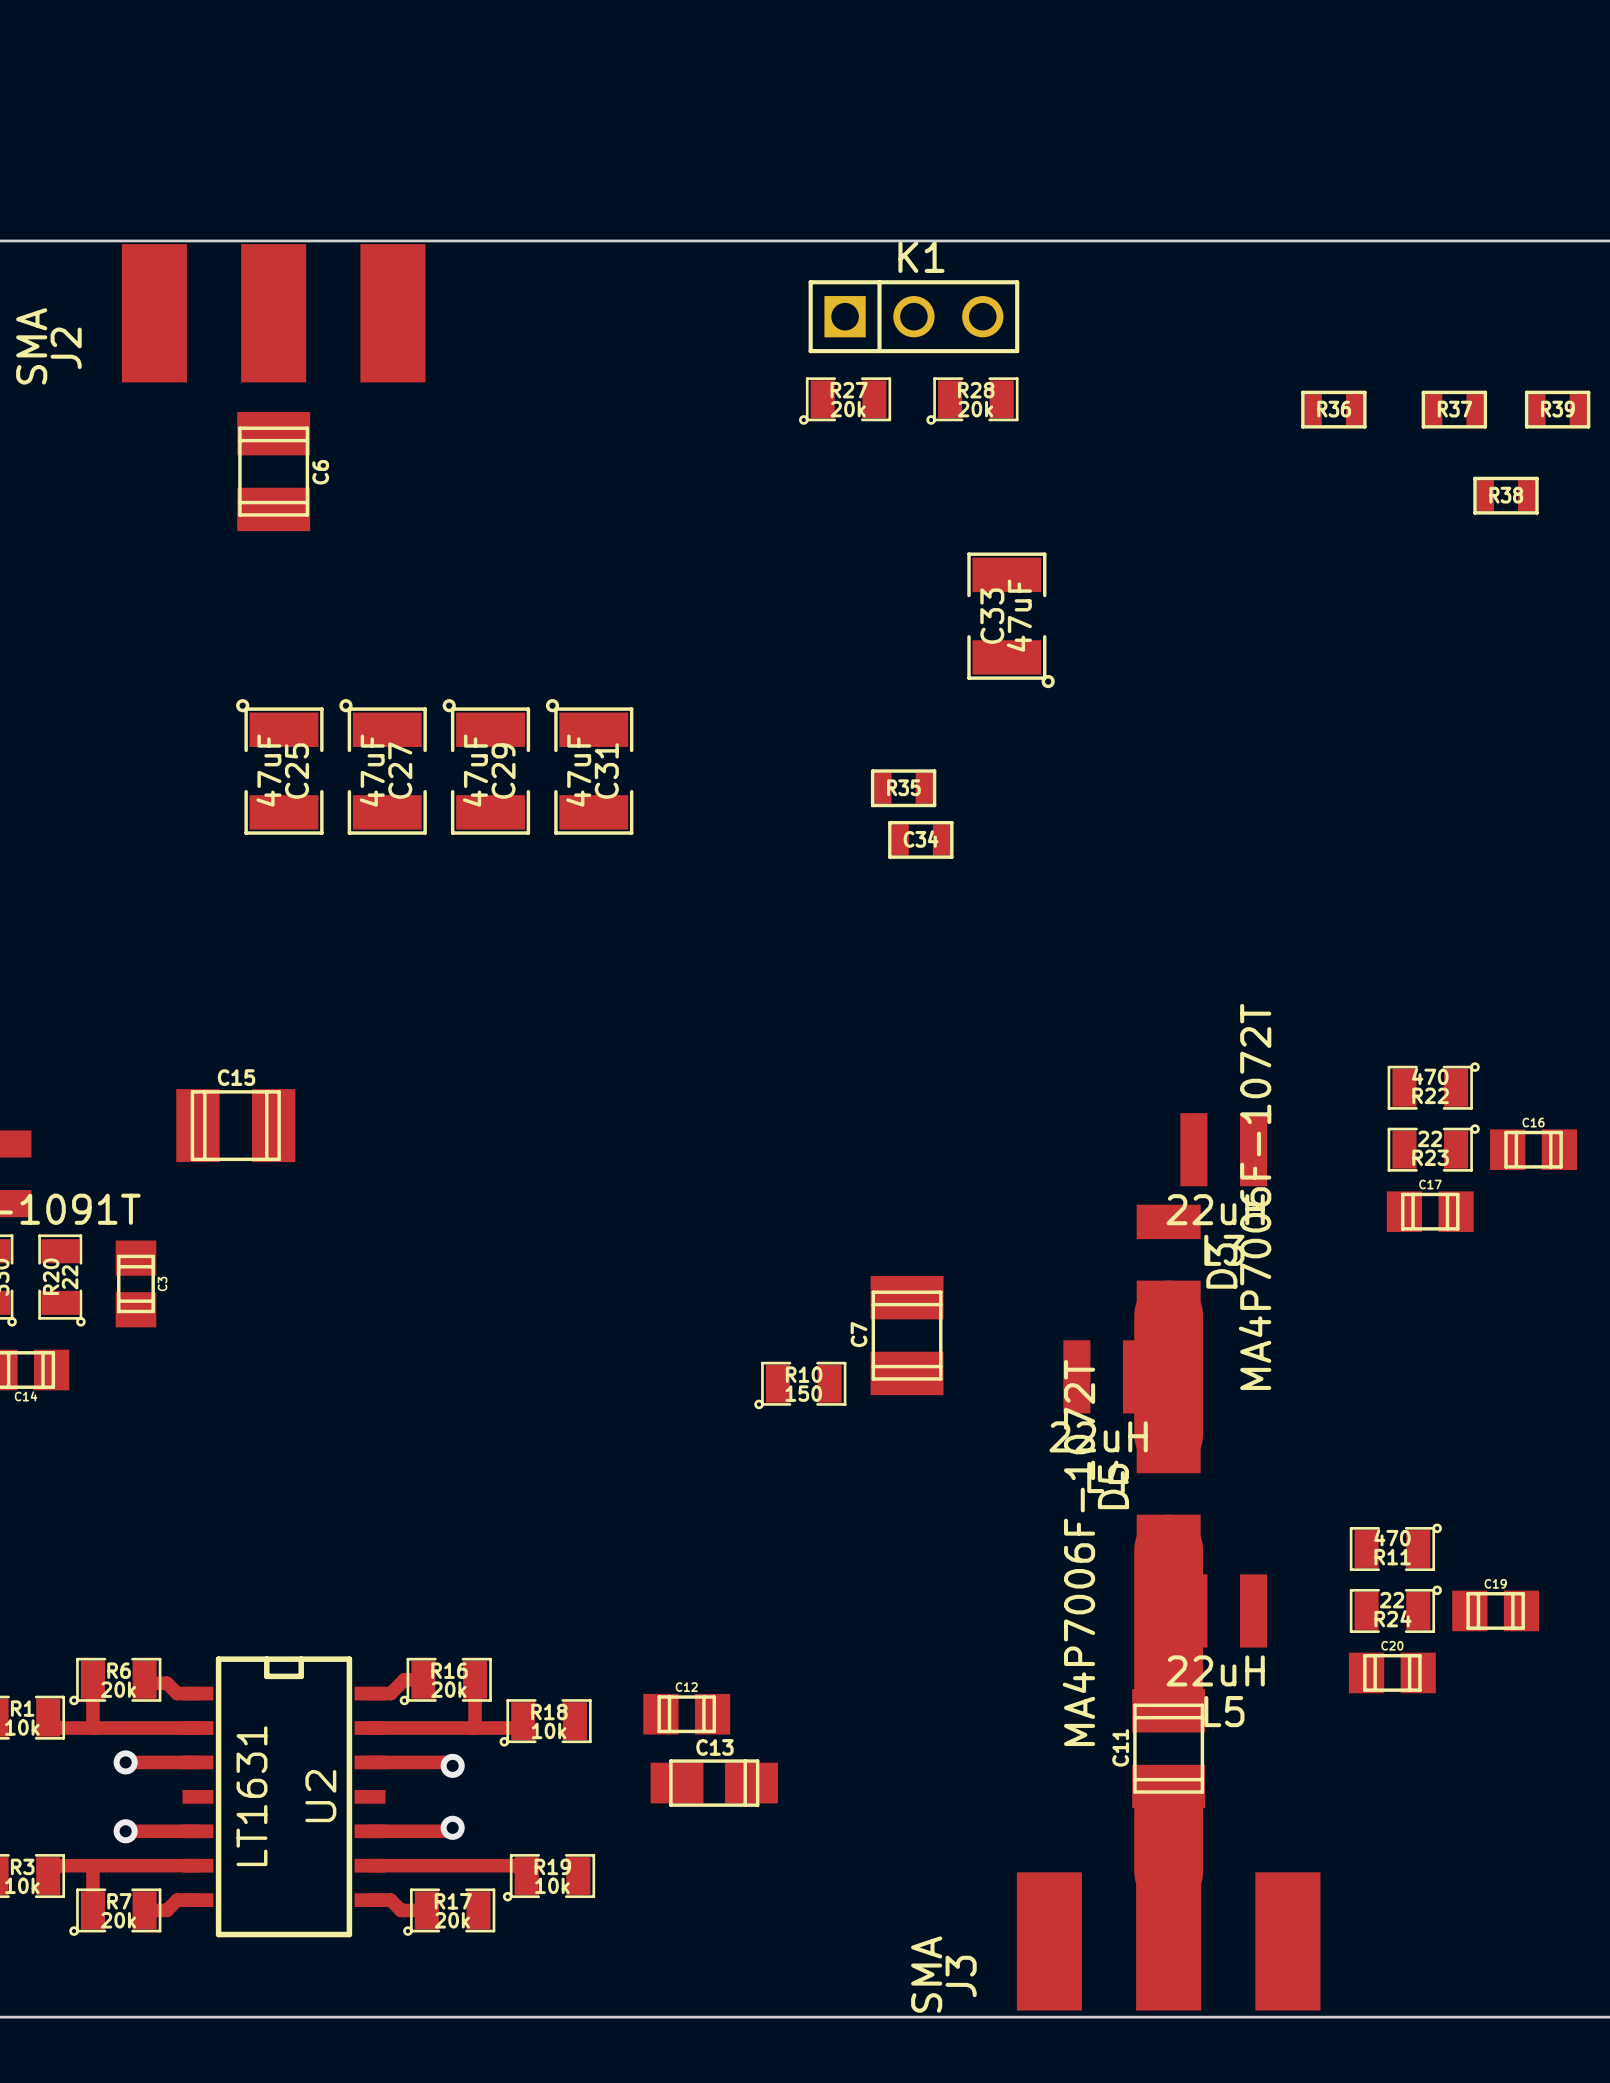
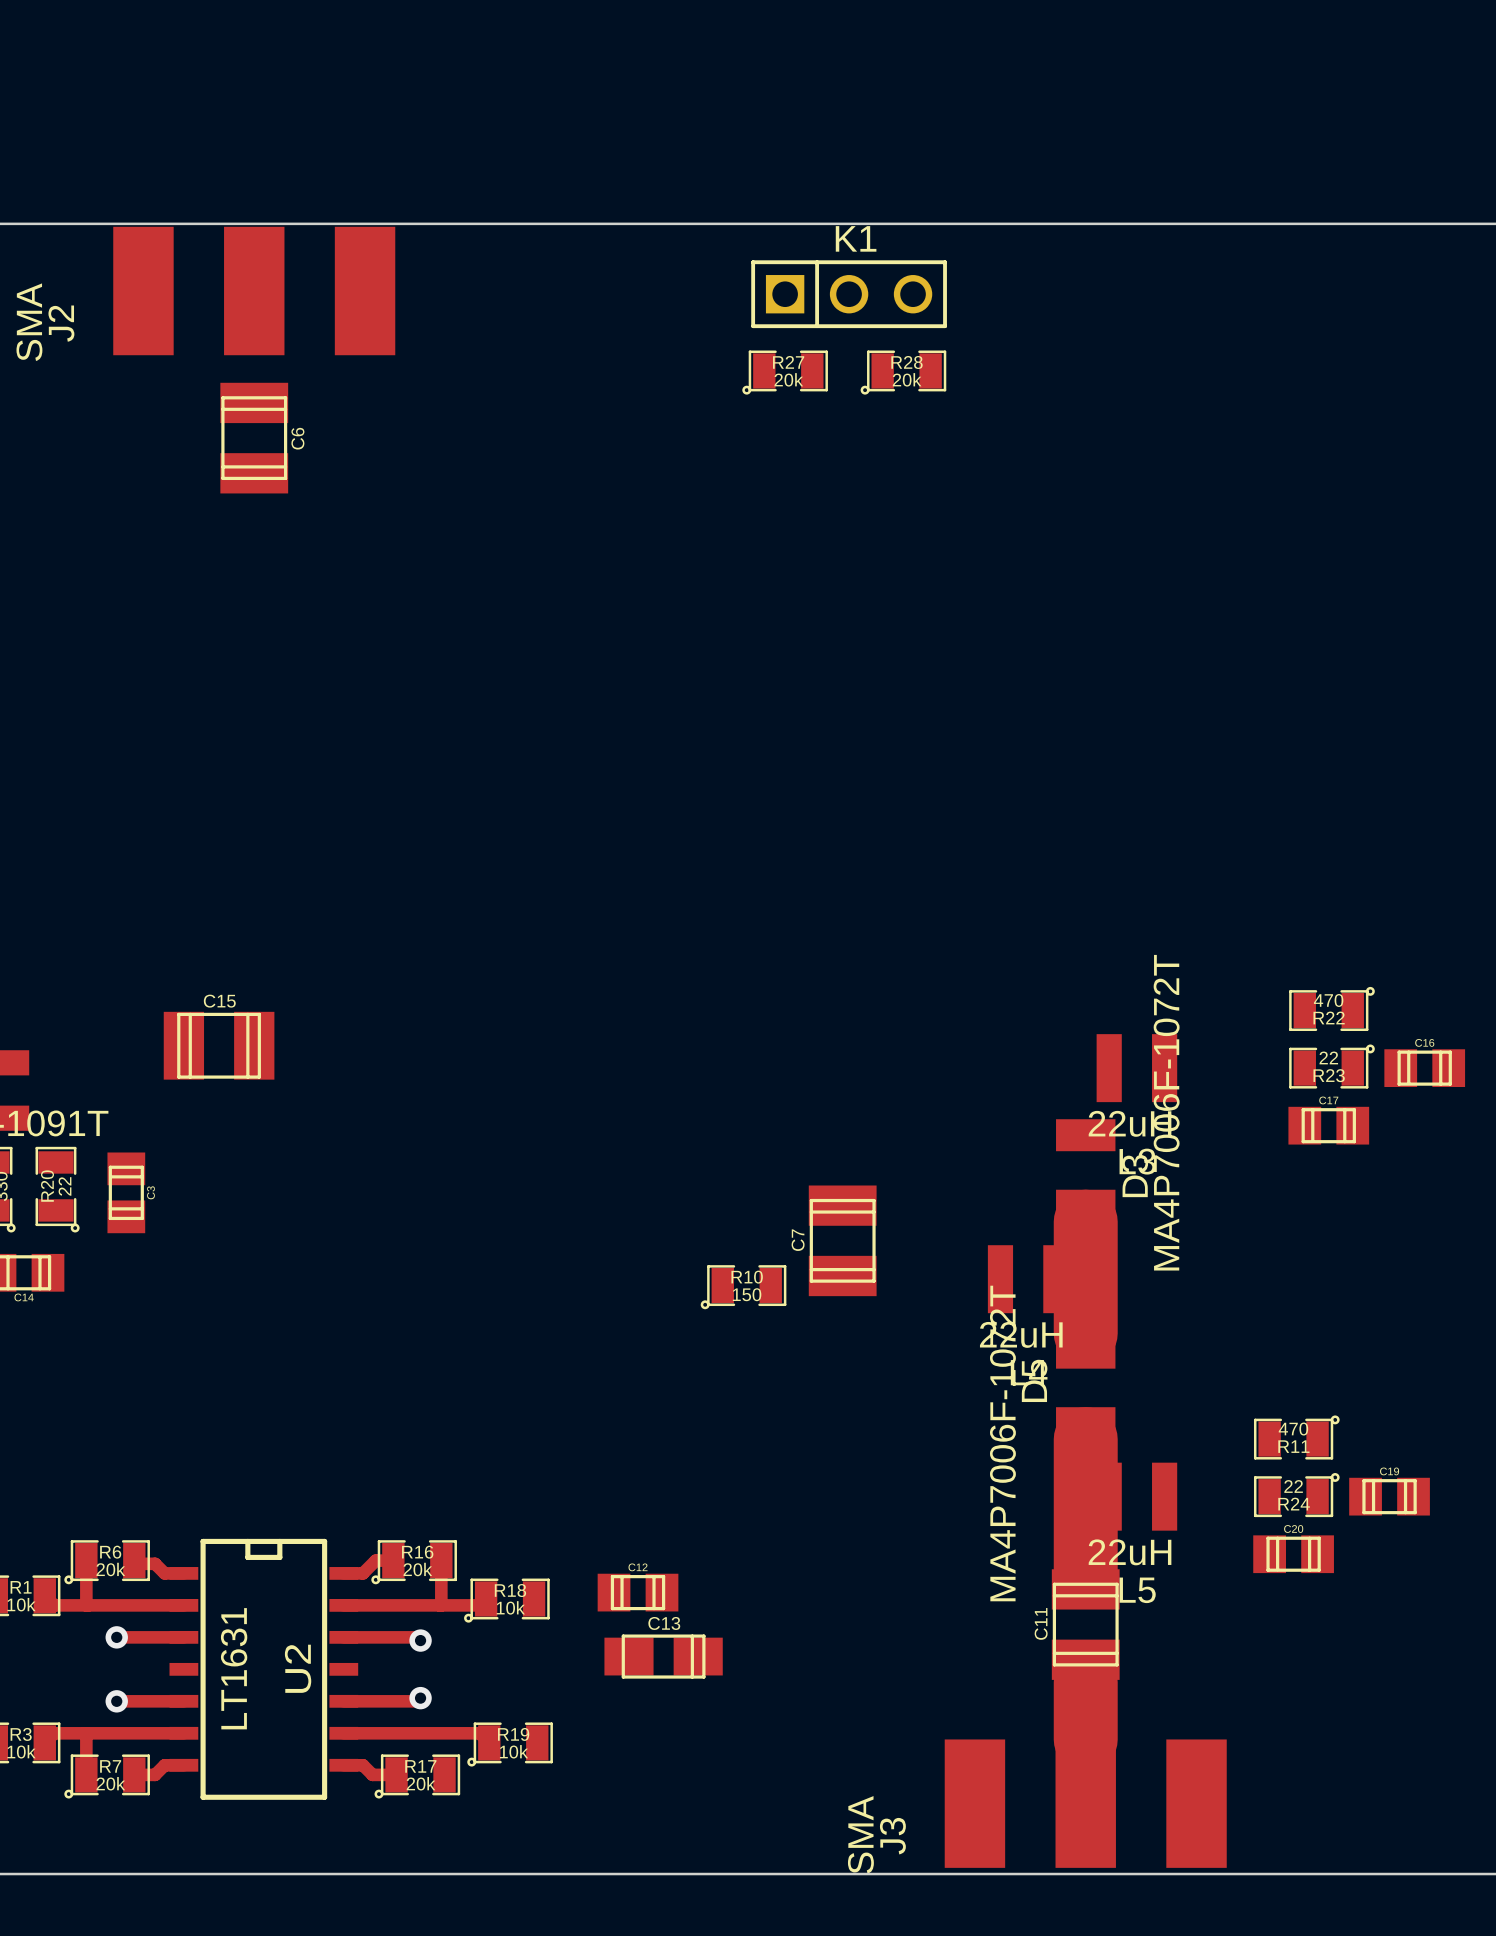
R36: (1333, 409) -> none
R37: (1454, 409) -> none
R39: (1557, 409) -> none
R38: (1506, 495) -> none
C33: 47uF (1011, 620) -> none
C25: 47uF (279, 766) -> none
C27: 47uF (383, 766) -> none
C29: 47uF (486, 766) -> none
C31: 47uF (589, 766) -> none
R35: (903, 788) -> none
C34: (920, 839) -> none

